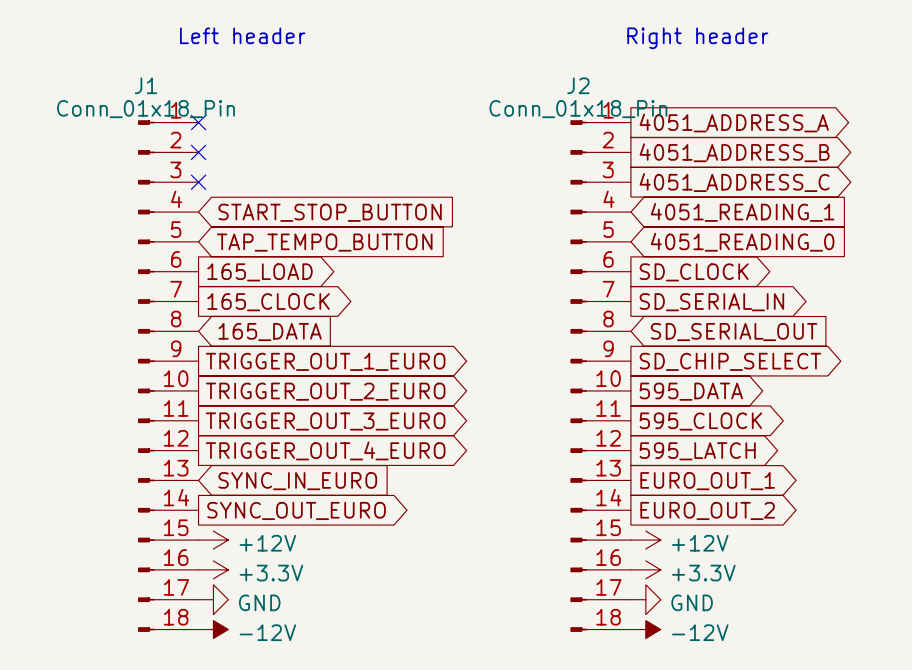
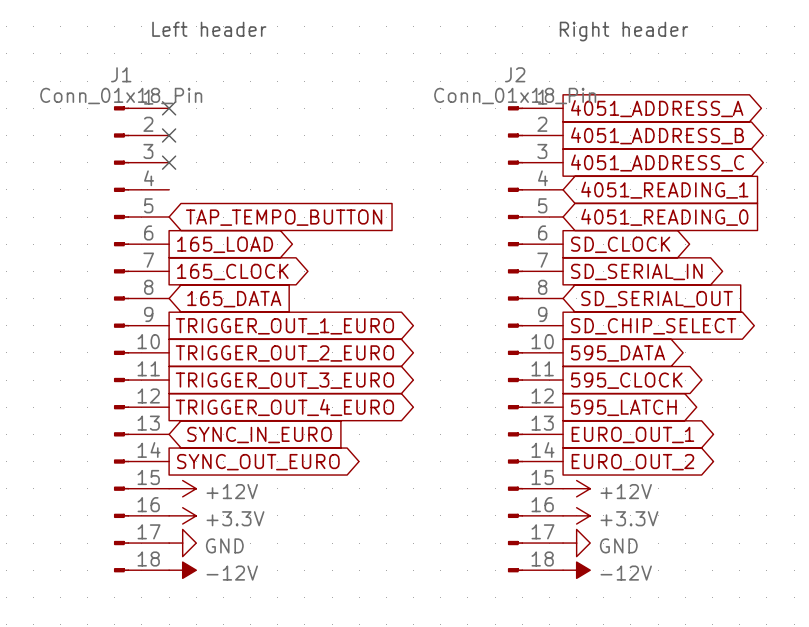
global label: START_STOP_BUTTON (330, 212) -> none

